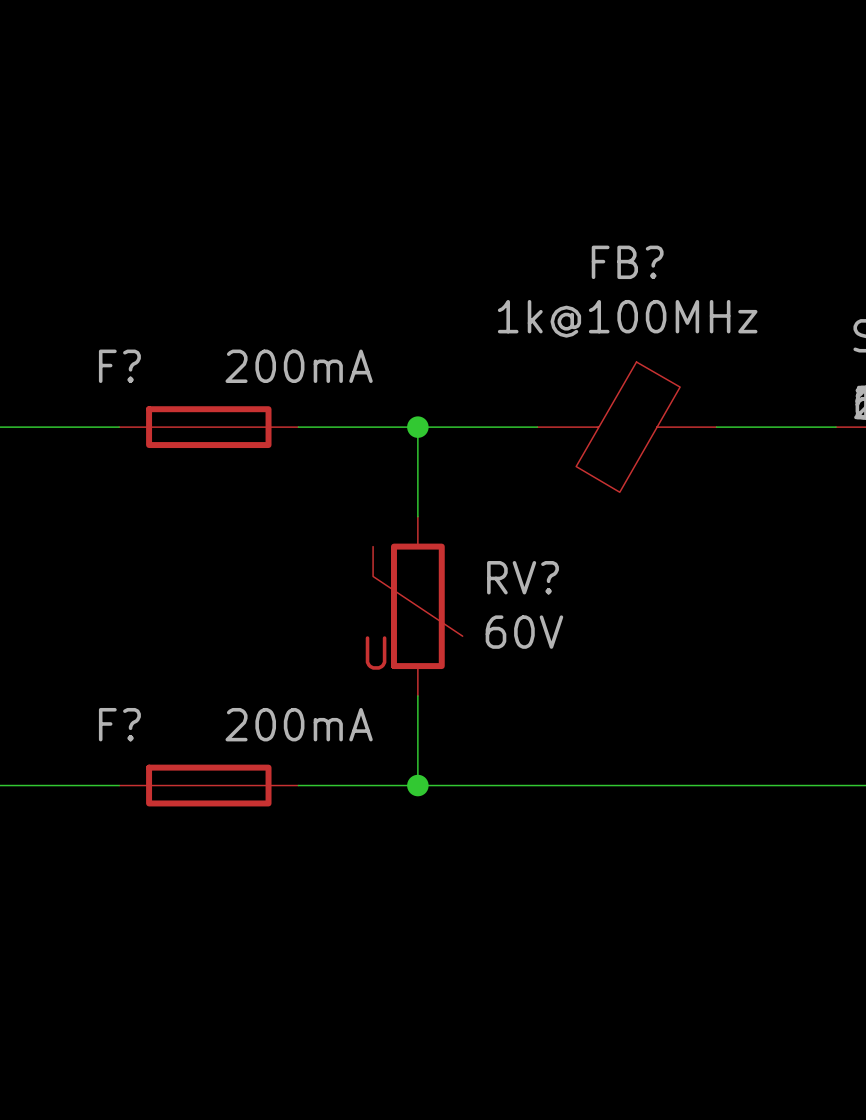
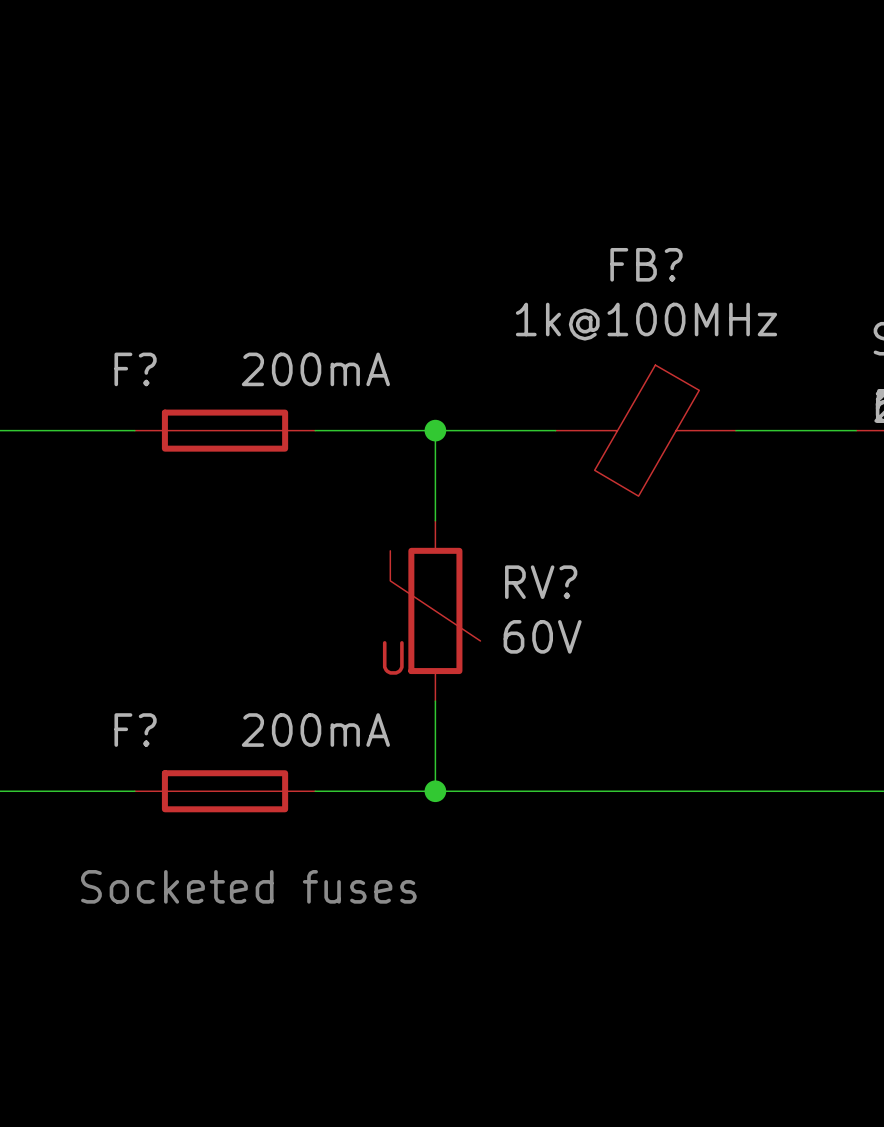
text: none -> Socketed fuses (248, 886)

